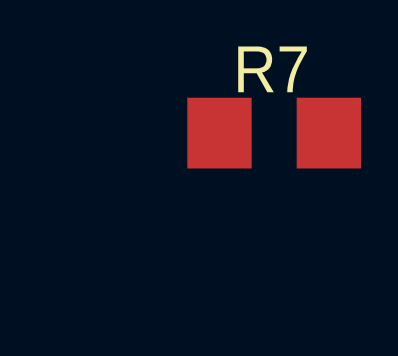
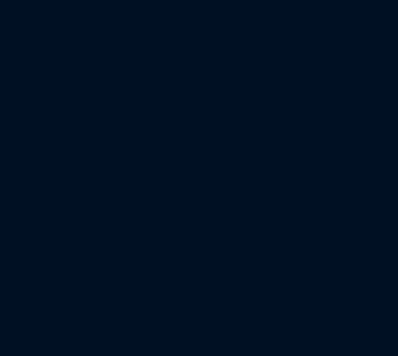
R7: (274, 133) -> none

